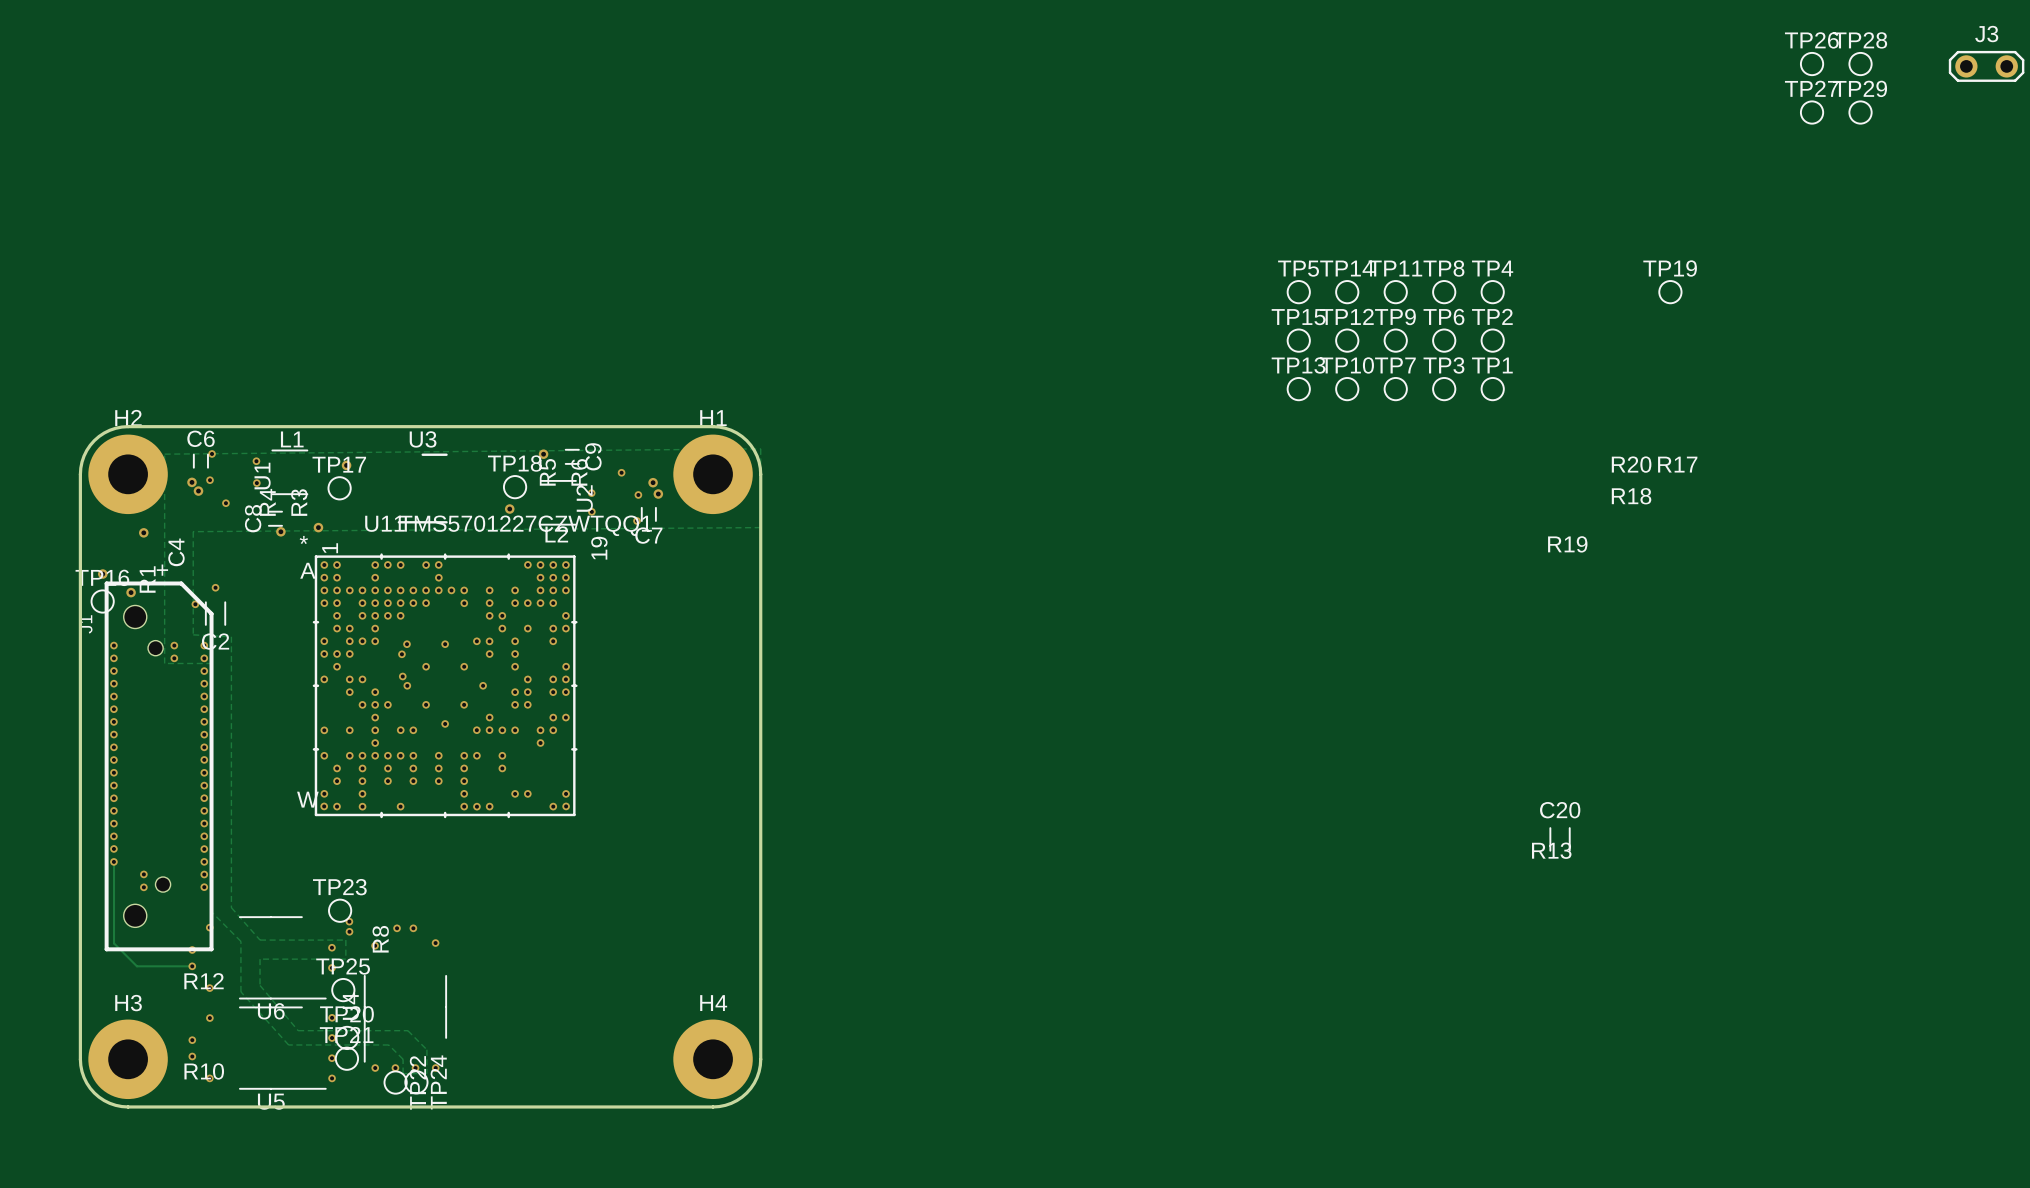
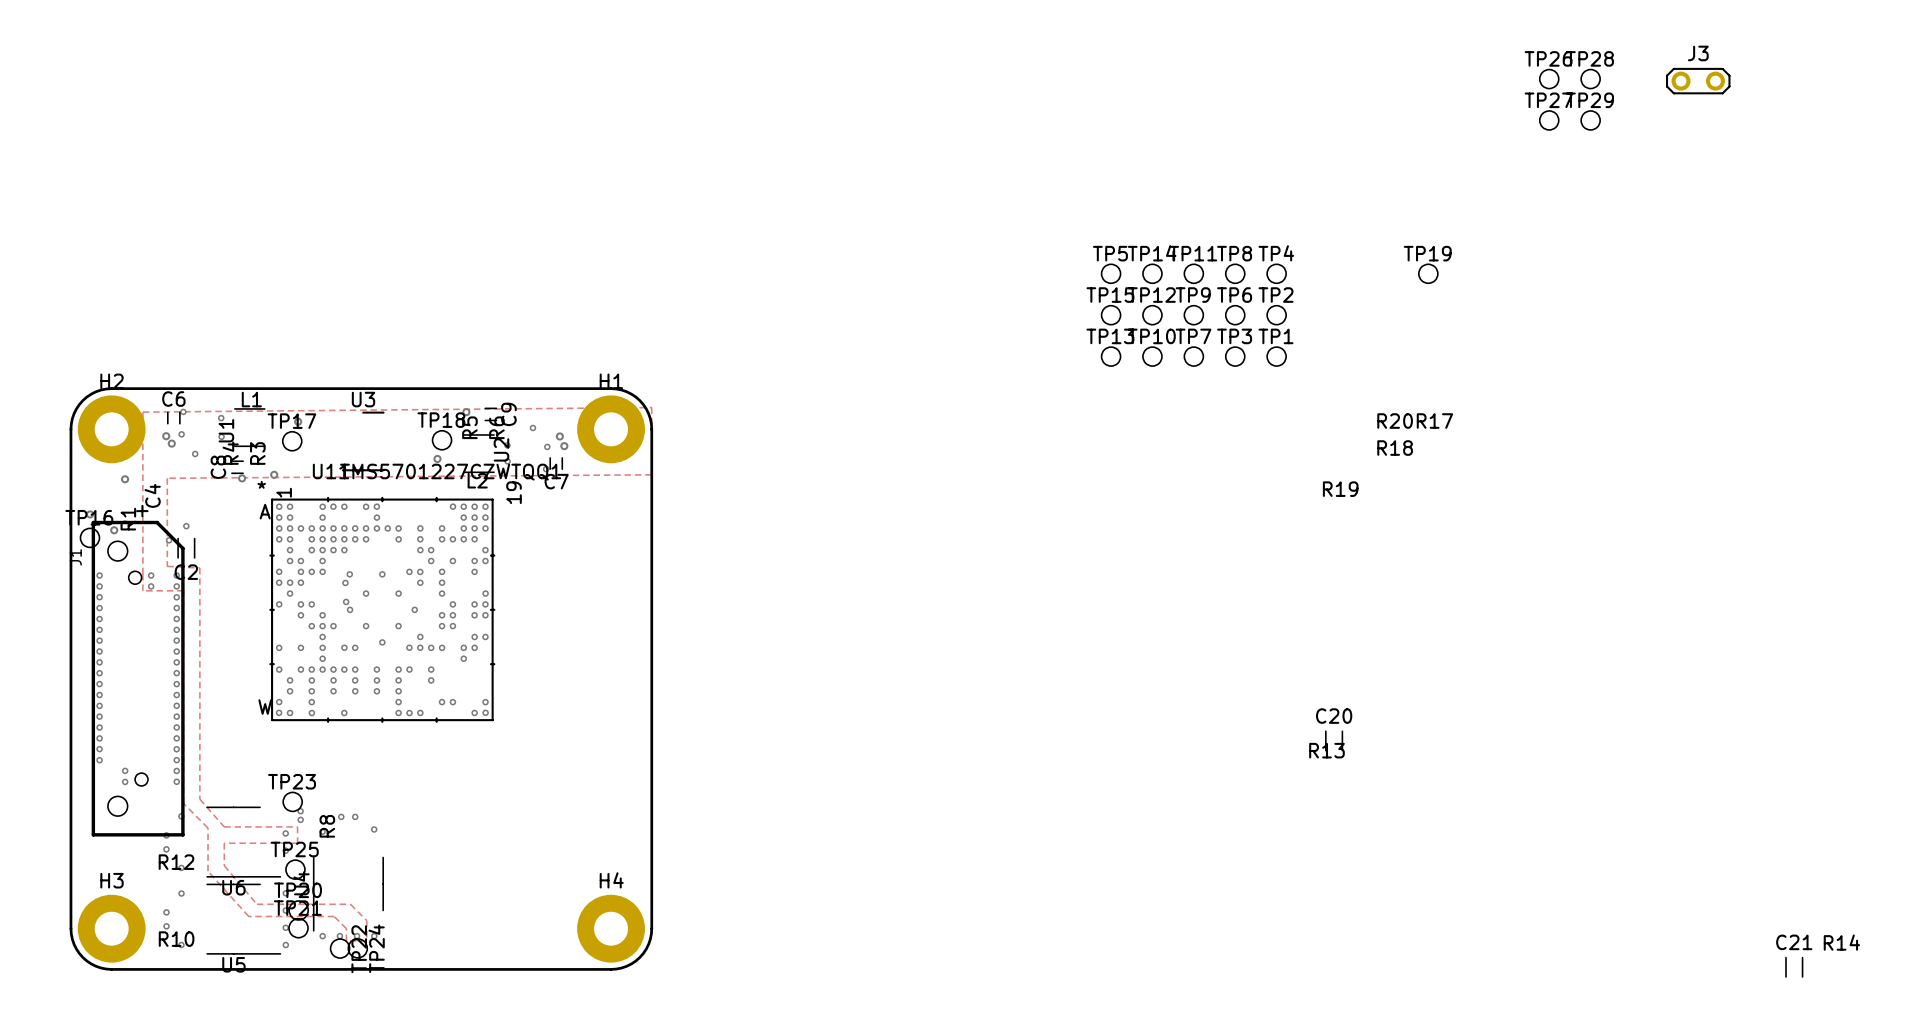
track: (114, 861) (114, 943) (136, 966) (192, 966) -> none

